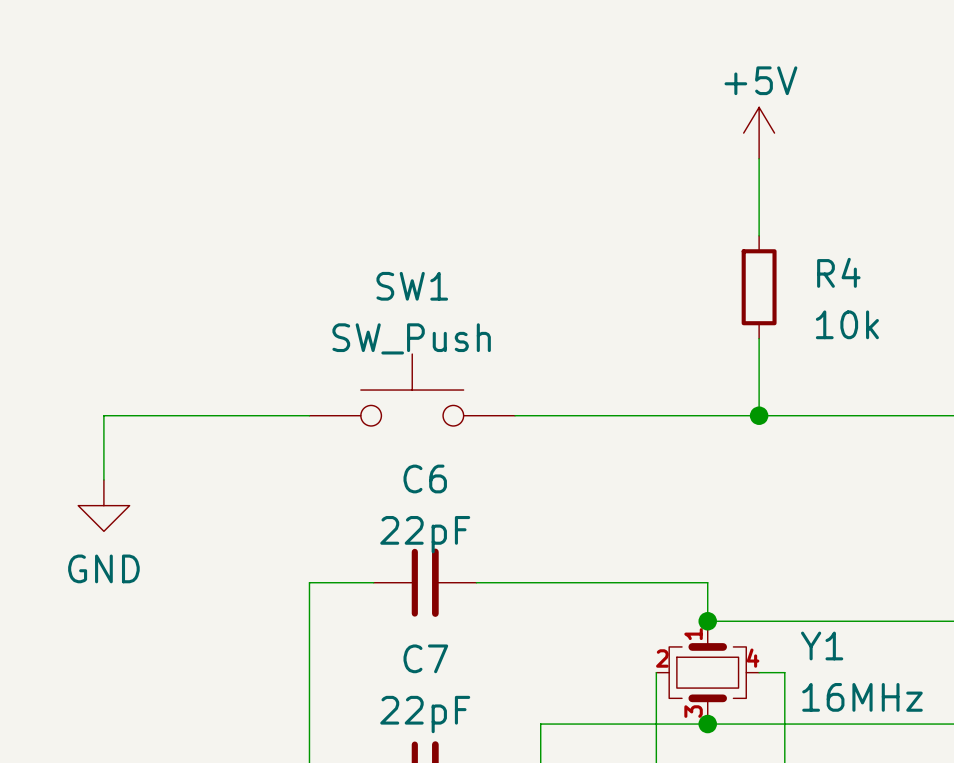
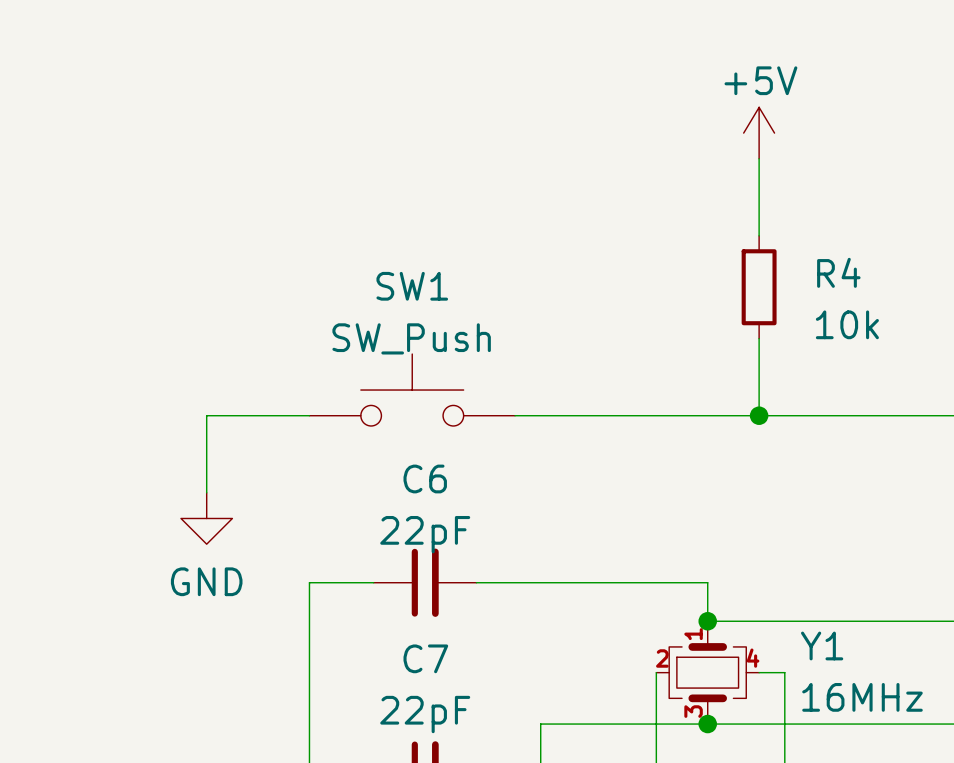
wire: (206, 415) (103, 415) (103, 479) -> (206, 415) (206, 492)
power symbol position: GND (103, 505) -> GND (206, 518)

